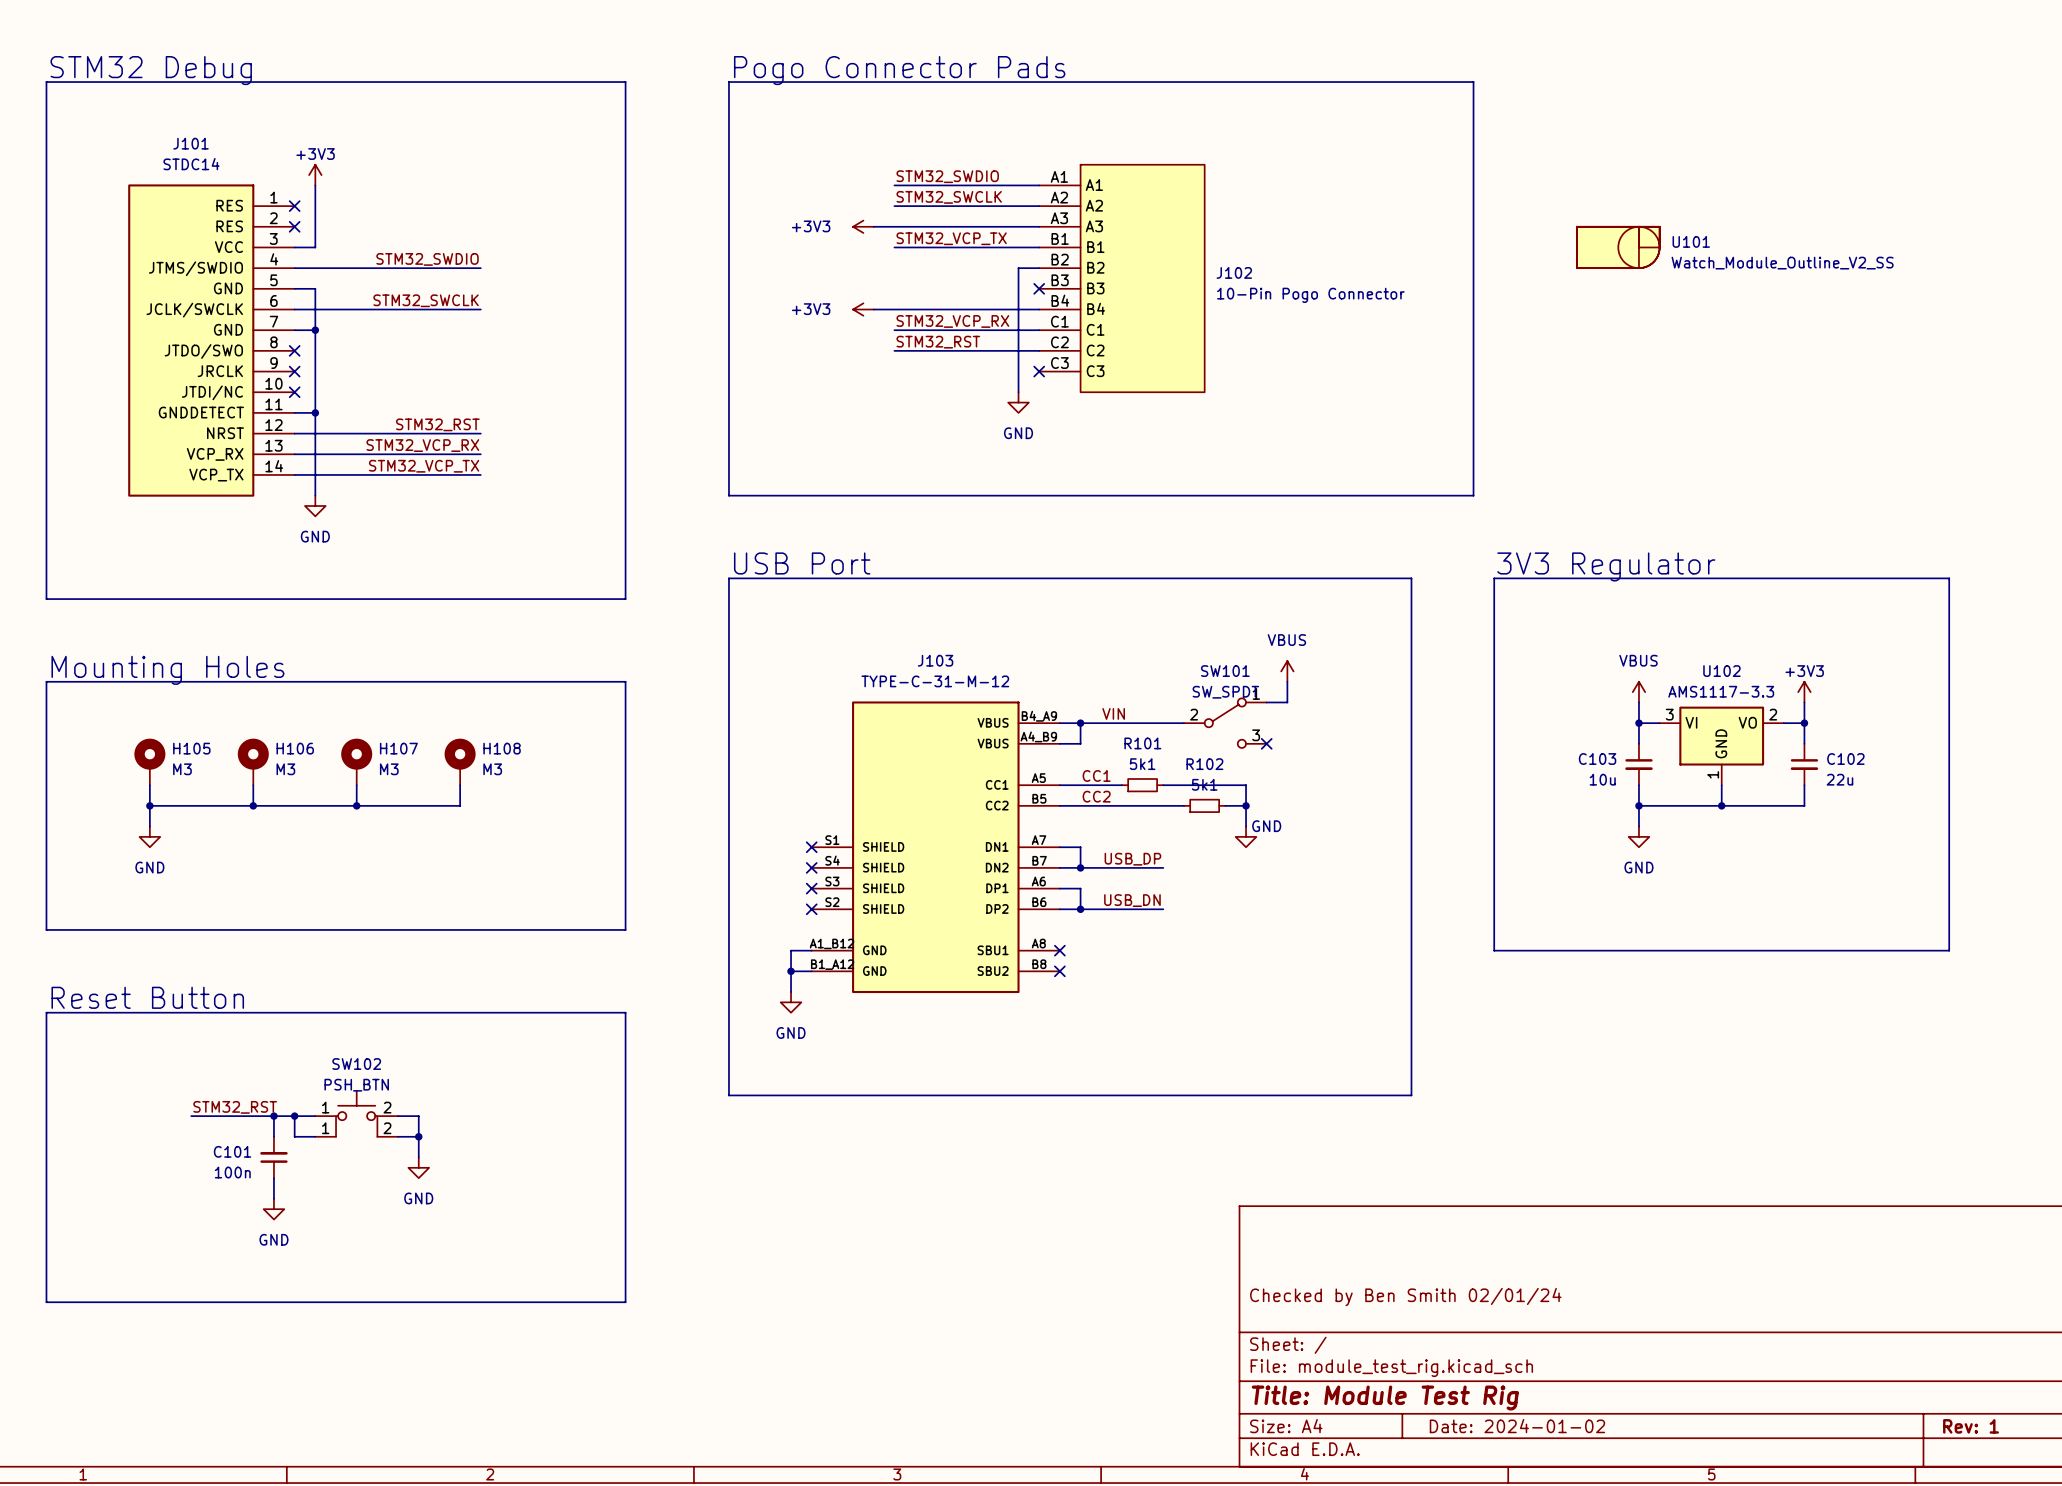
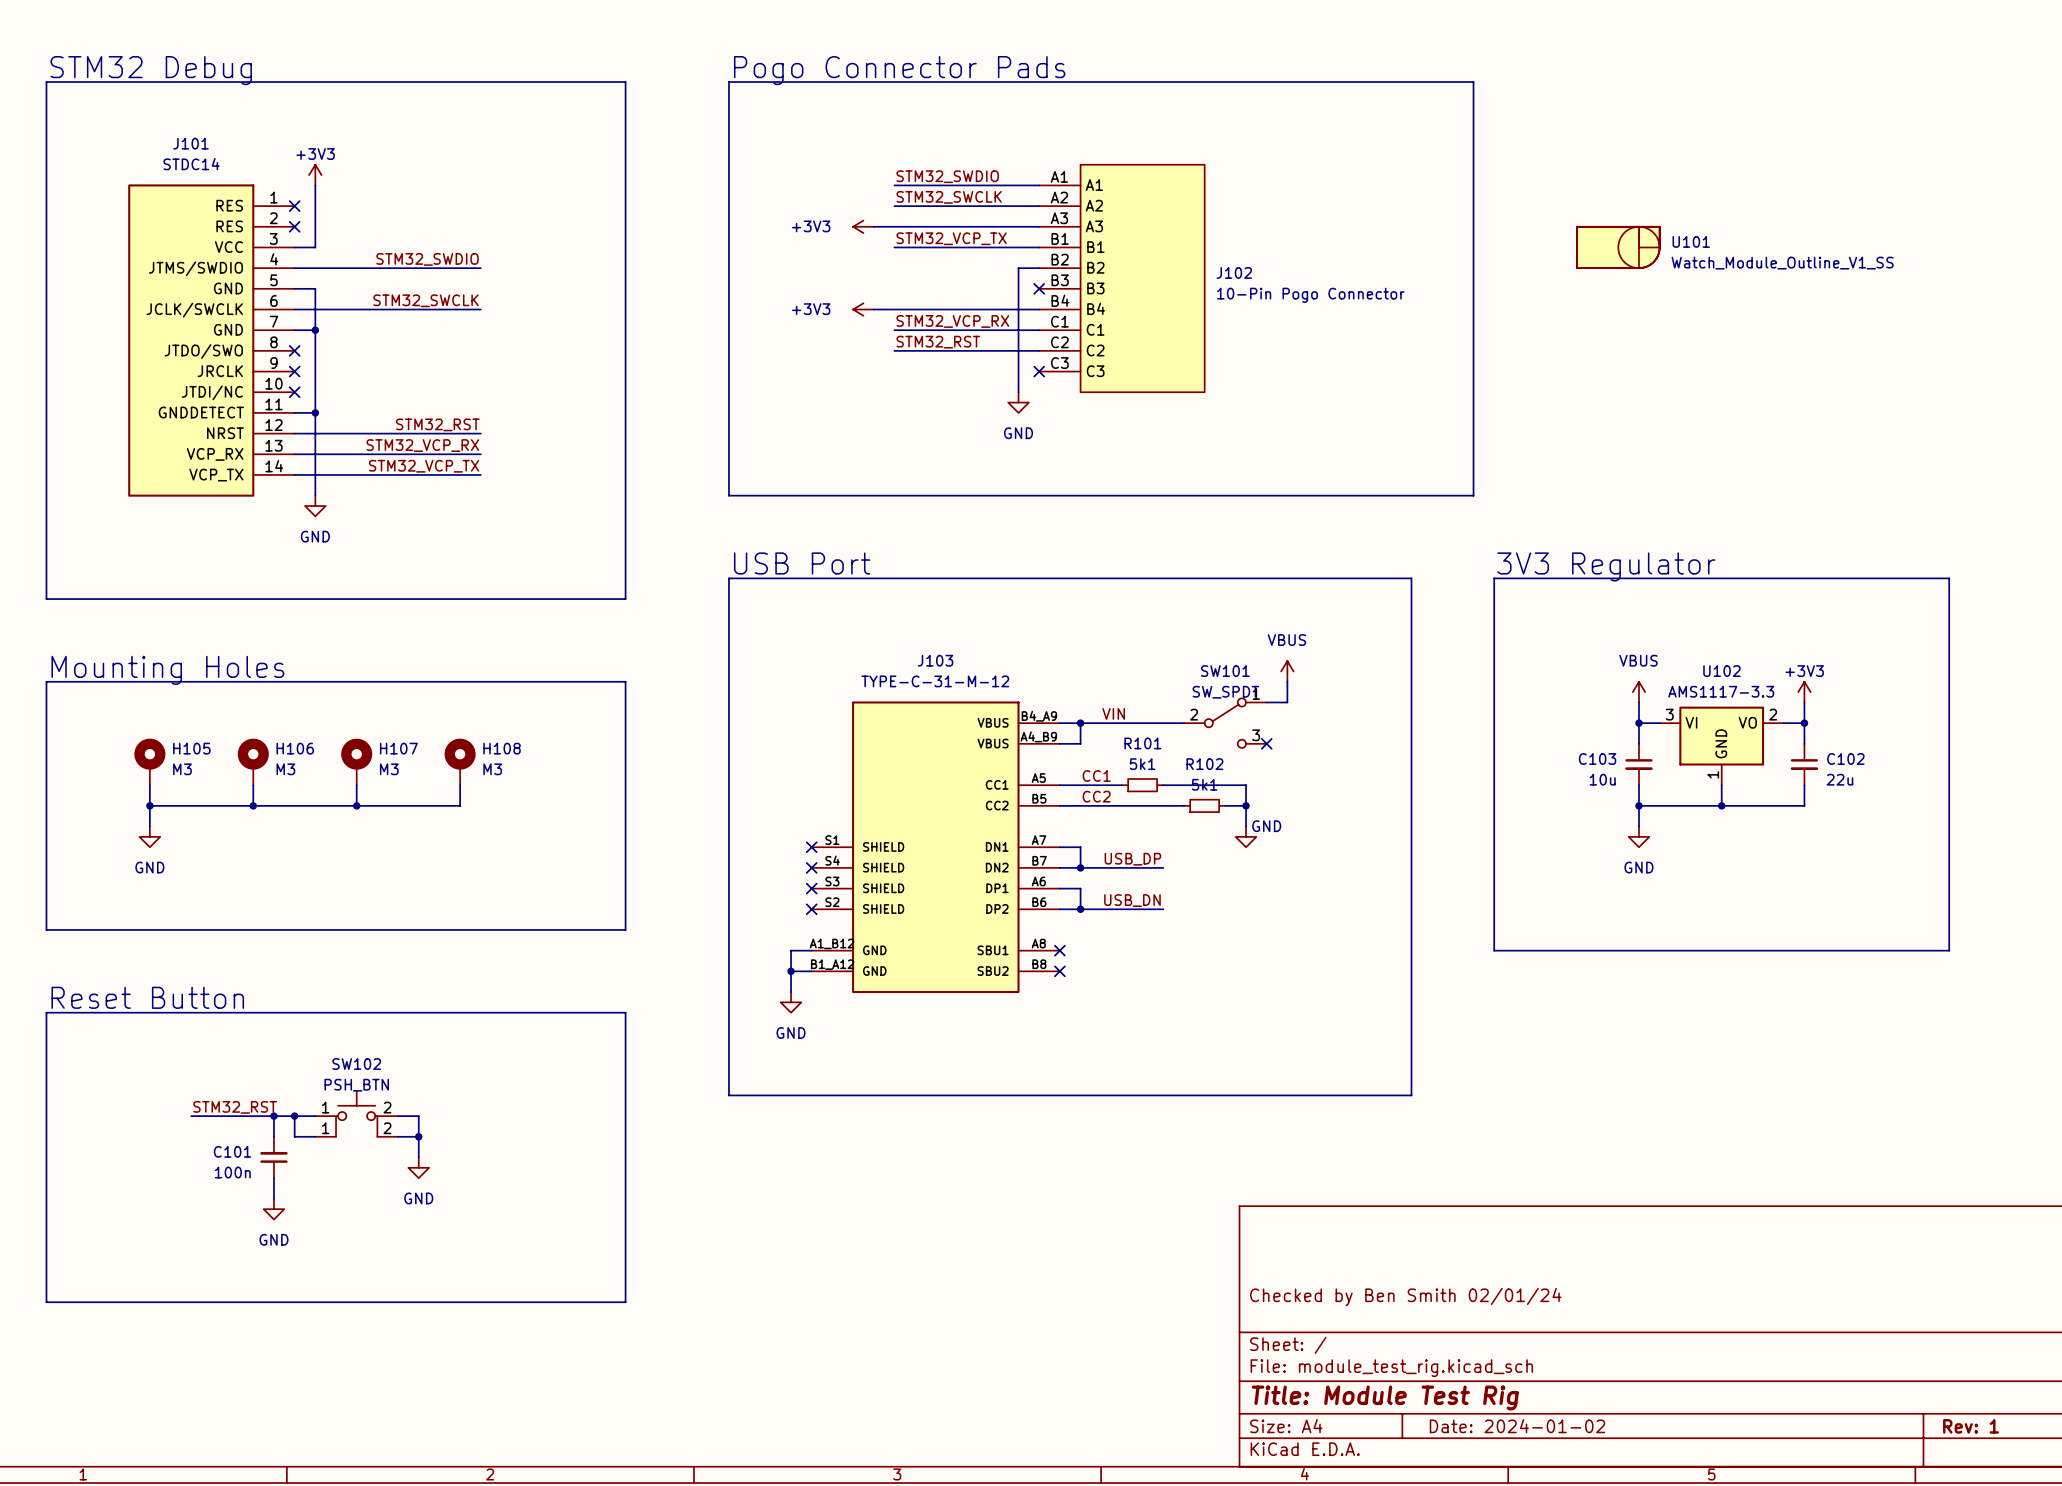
U101 value: Watch_Module_Outline_V2_SS (1782, 263) -> Watch_Module_Outline_V1_SS (1782, 263)

